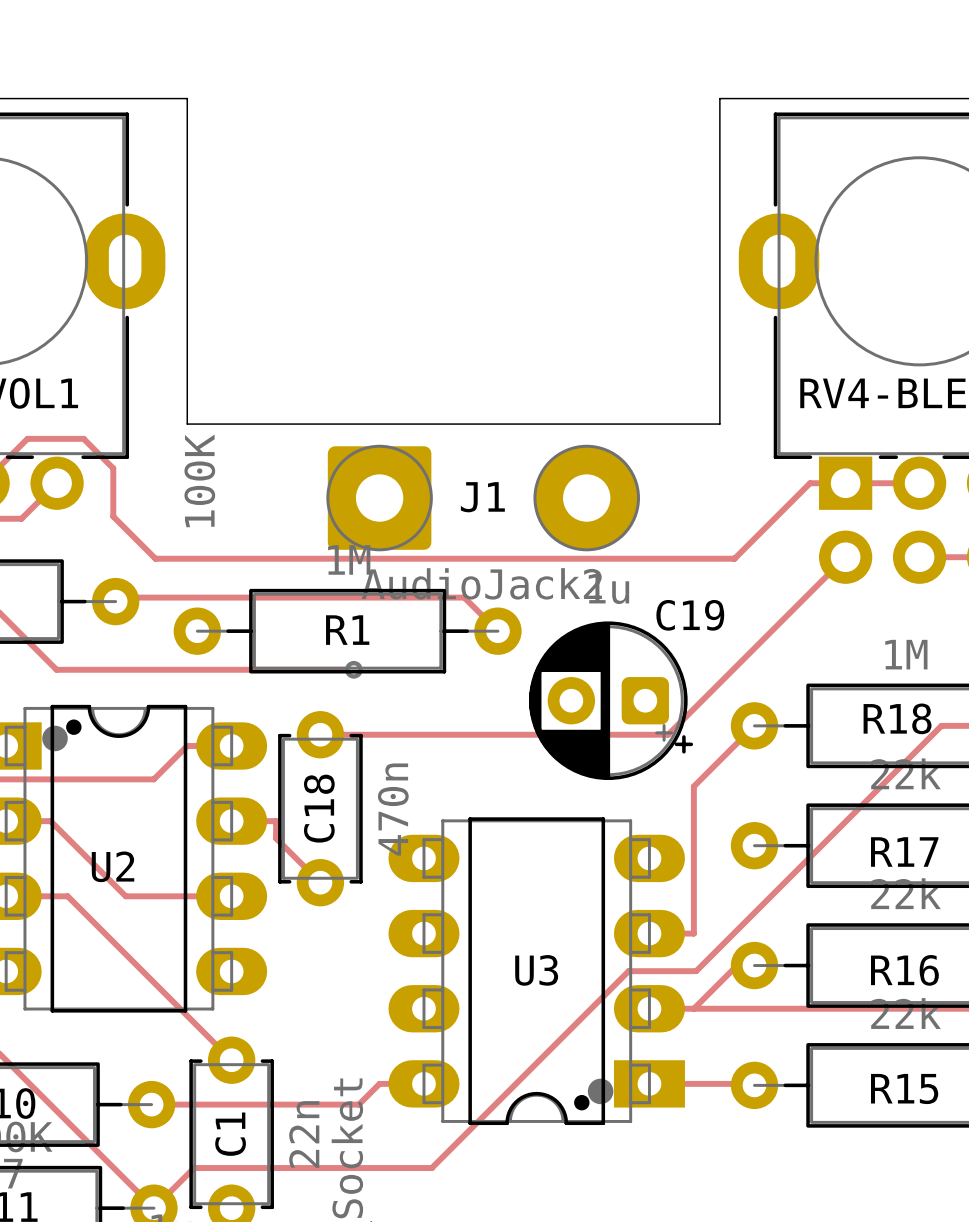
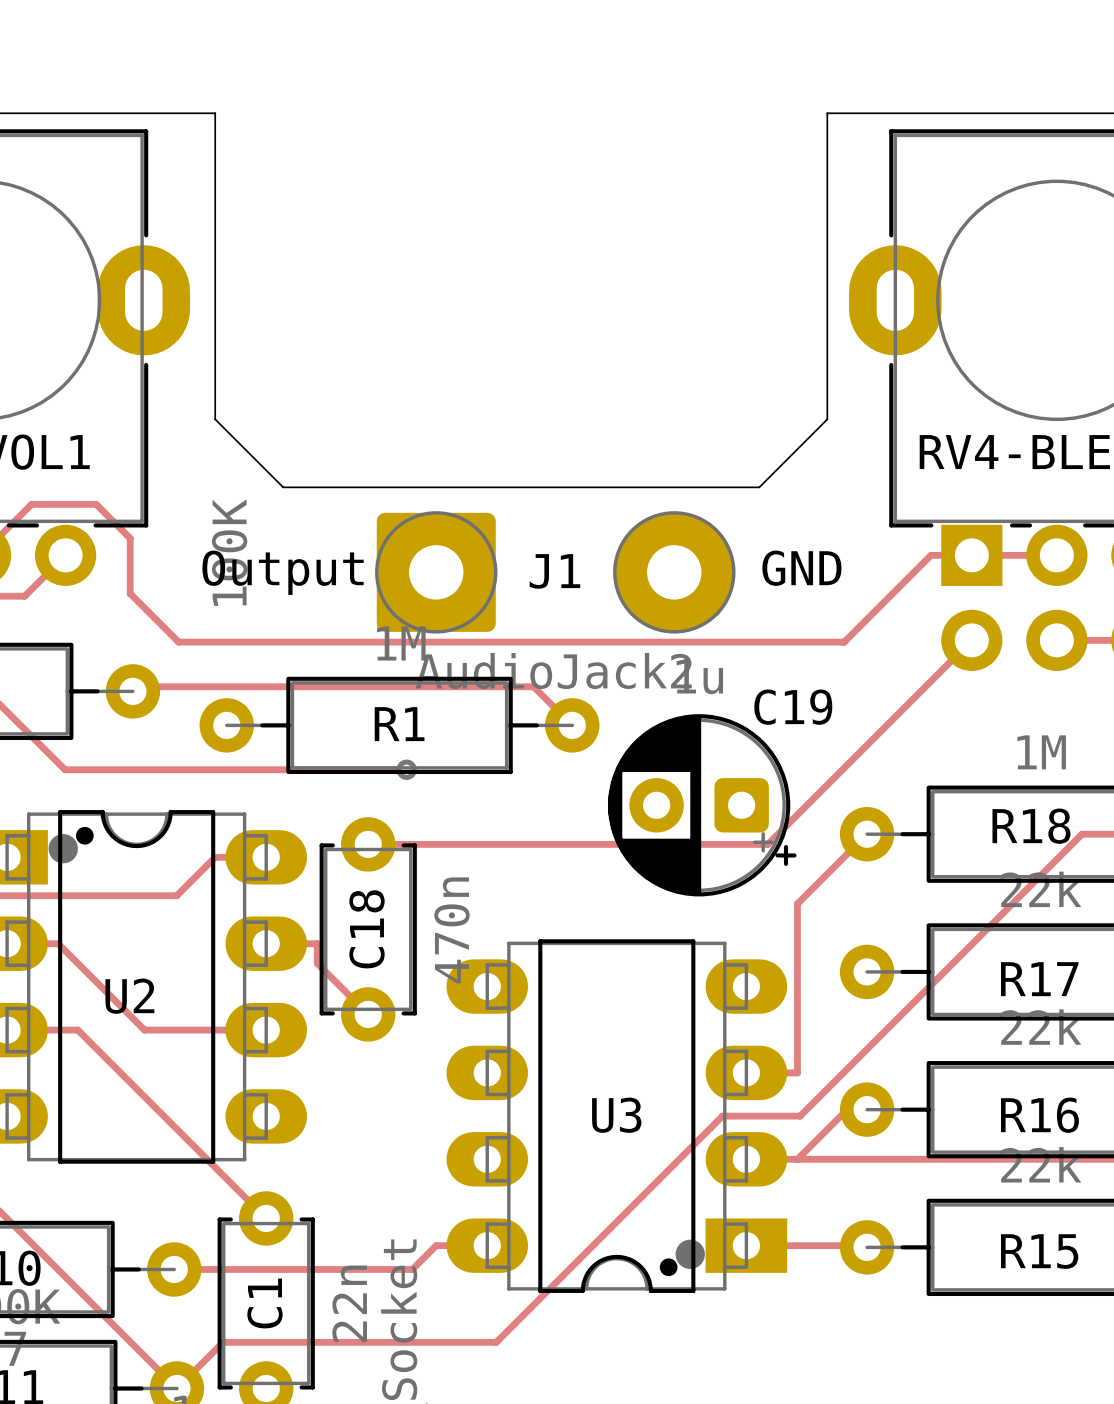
board edge: (187, 364) (187, 424) (246, 424) -> (215, 419) (283, 487)
board edge: (719, 364) (719, 424) (660, 424) -> (827, 419) (759, 487)
text: none -> GND (801, 568)
text: none -> Output (283, 572)

